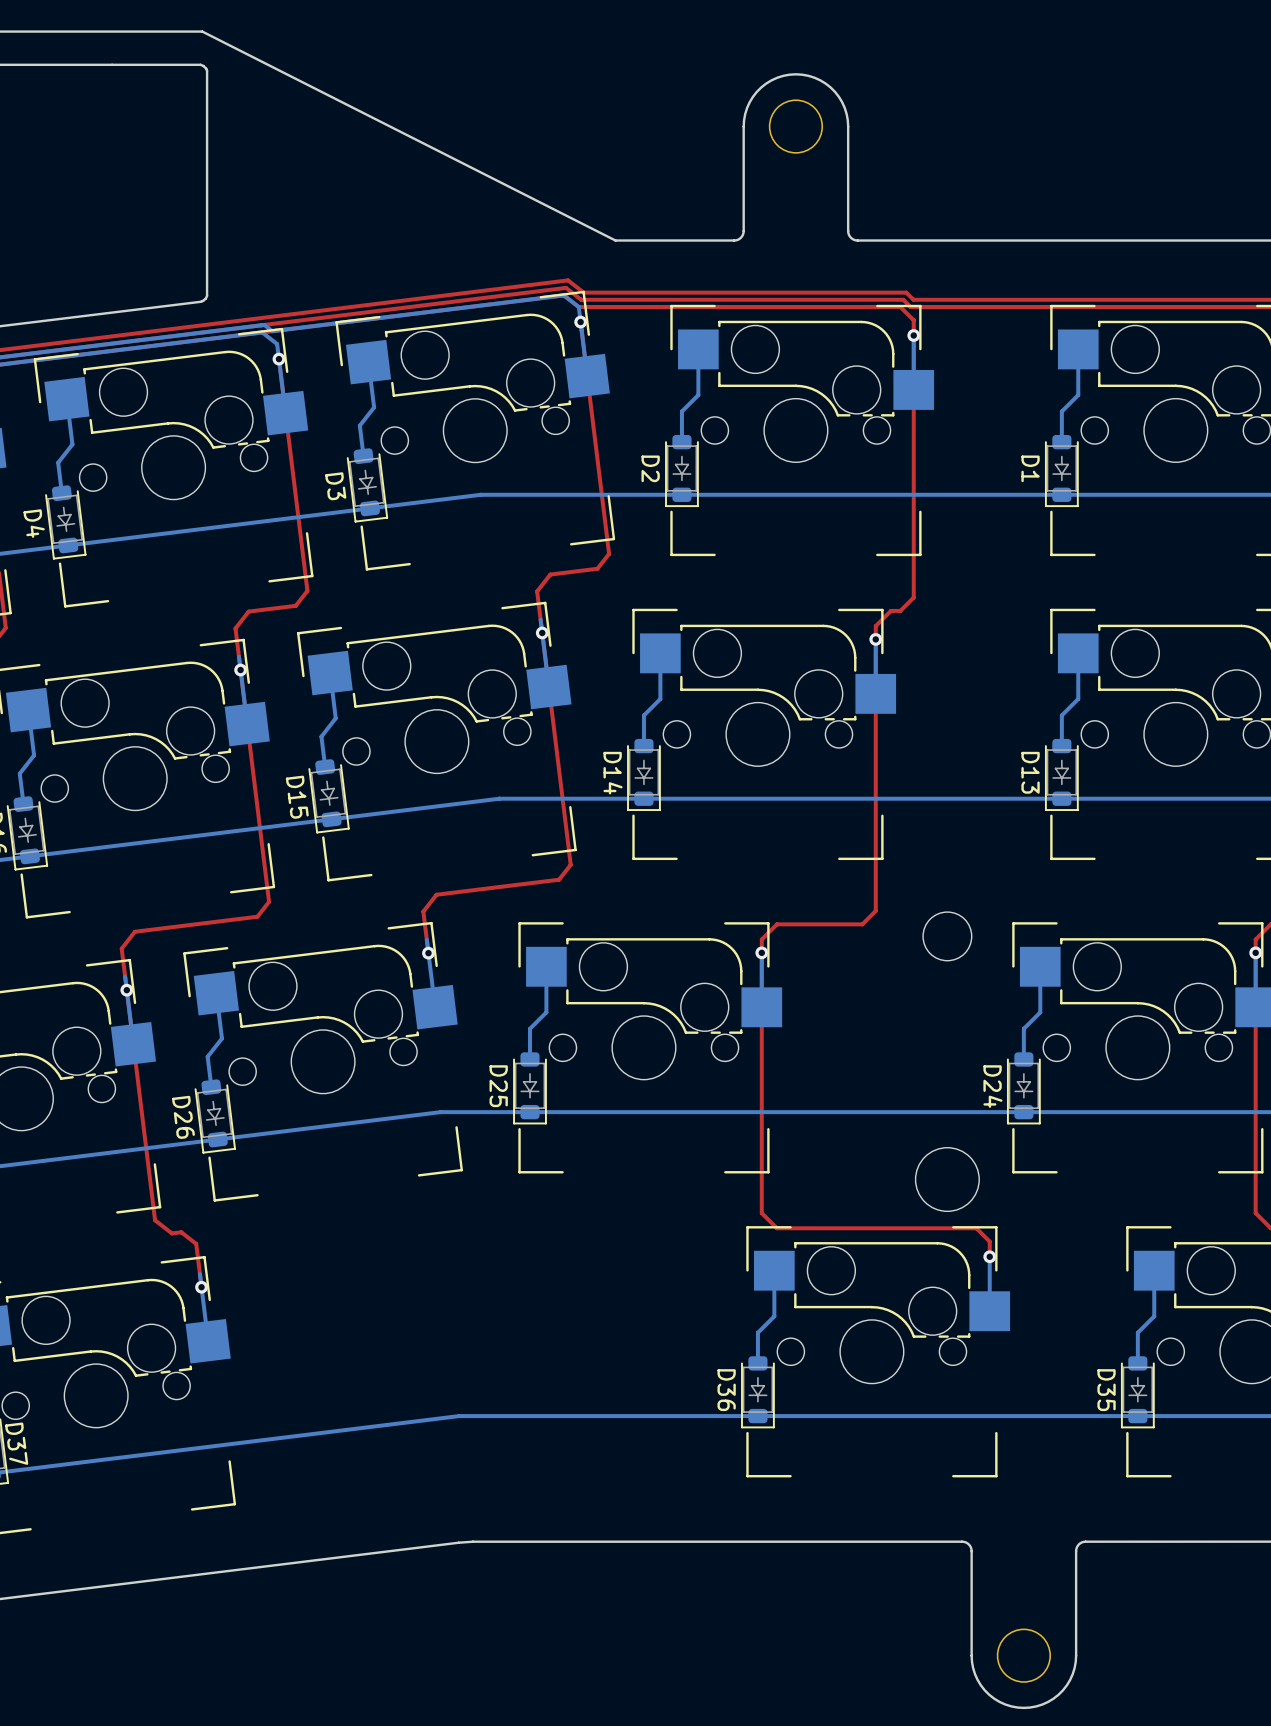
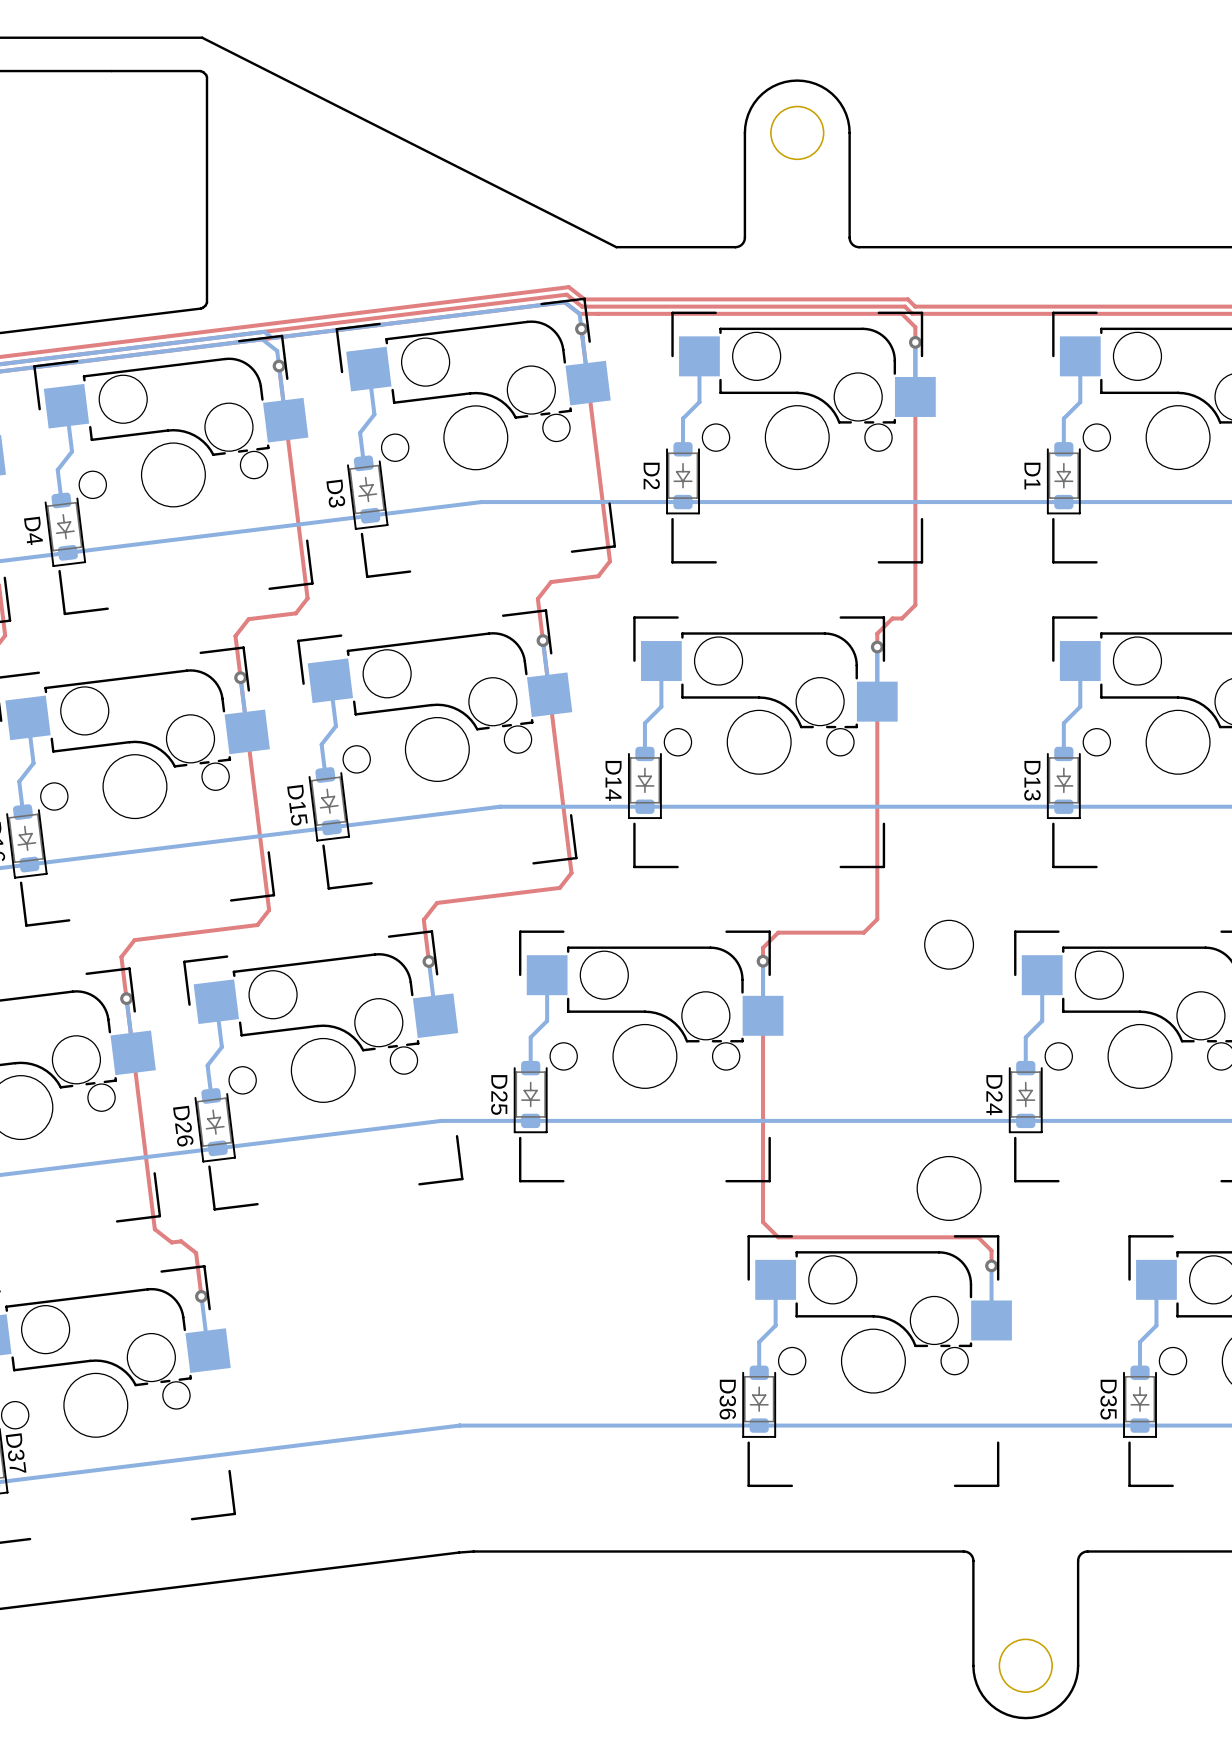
bottom track: (540, 619) (542, 632) -> none
bottom track: (238, 656) (240, 670) -> none
bottom track: (426, 939) (428, 953) -> none
bottom track: (125, 976) (126, 990) -> none
bottom track: (199, 1273) (201, 1287) -> none

